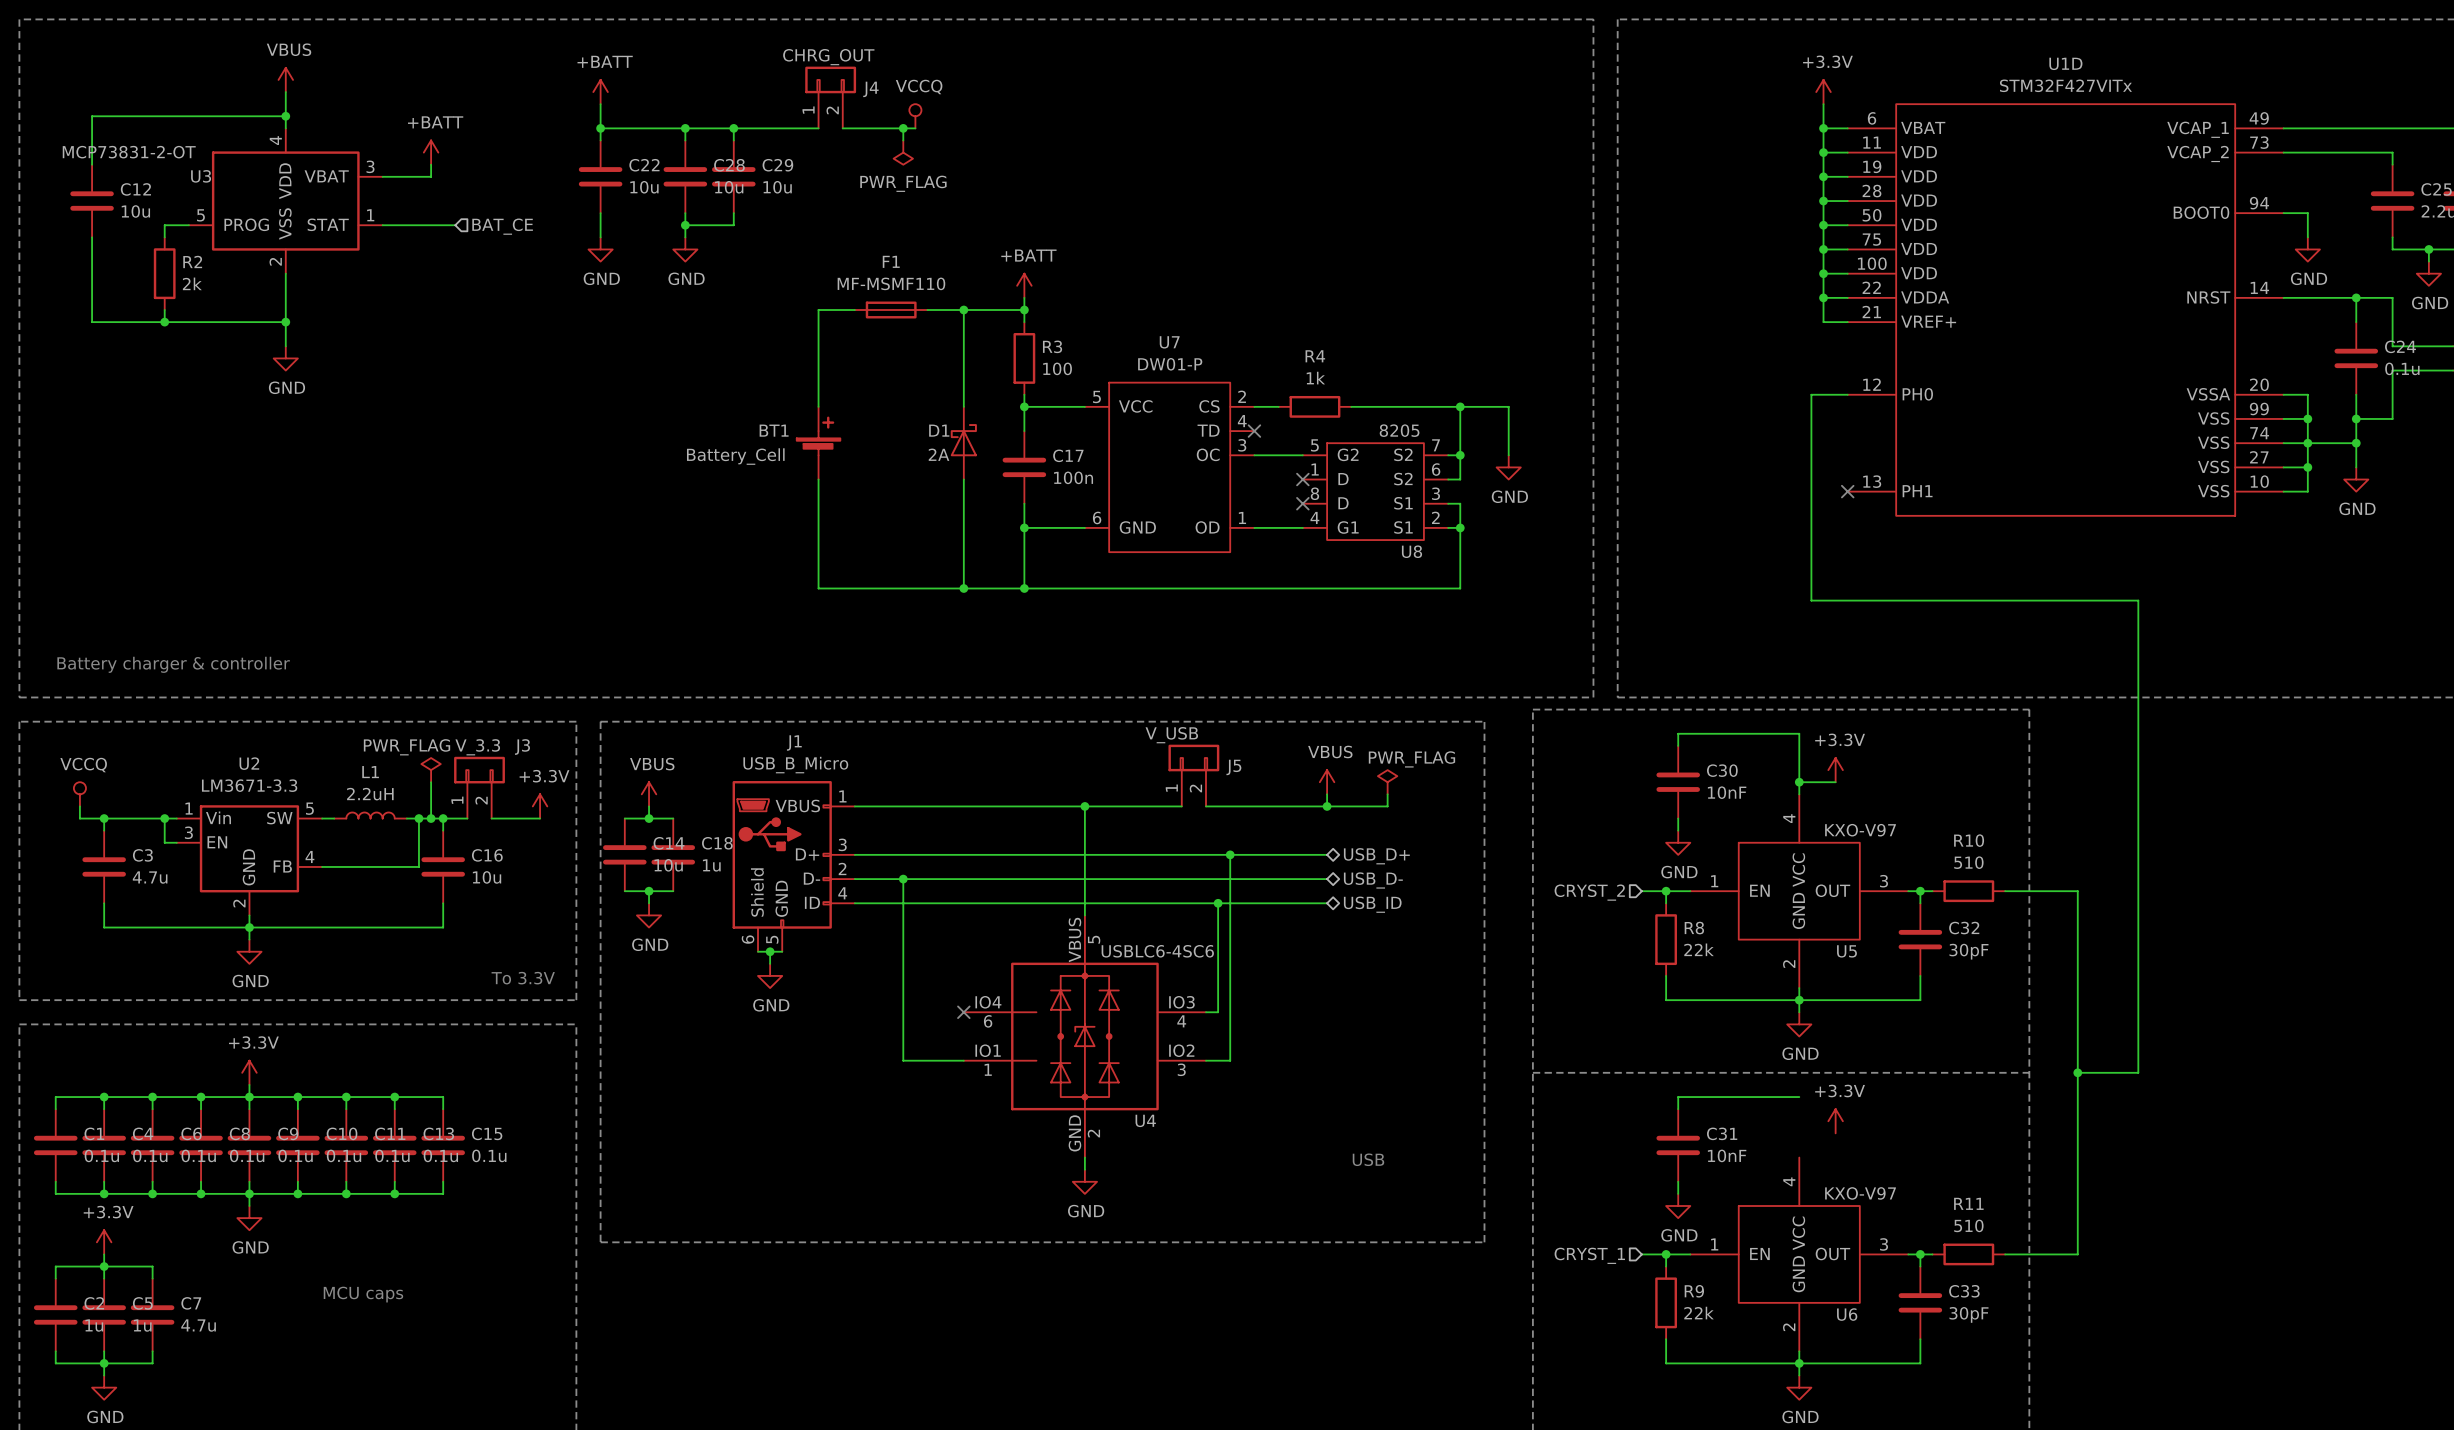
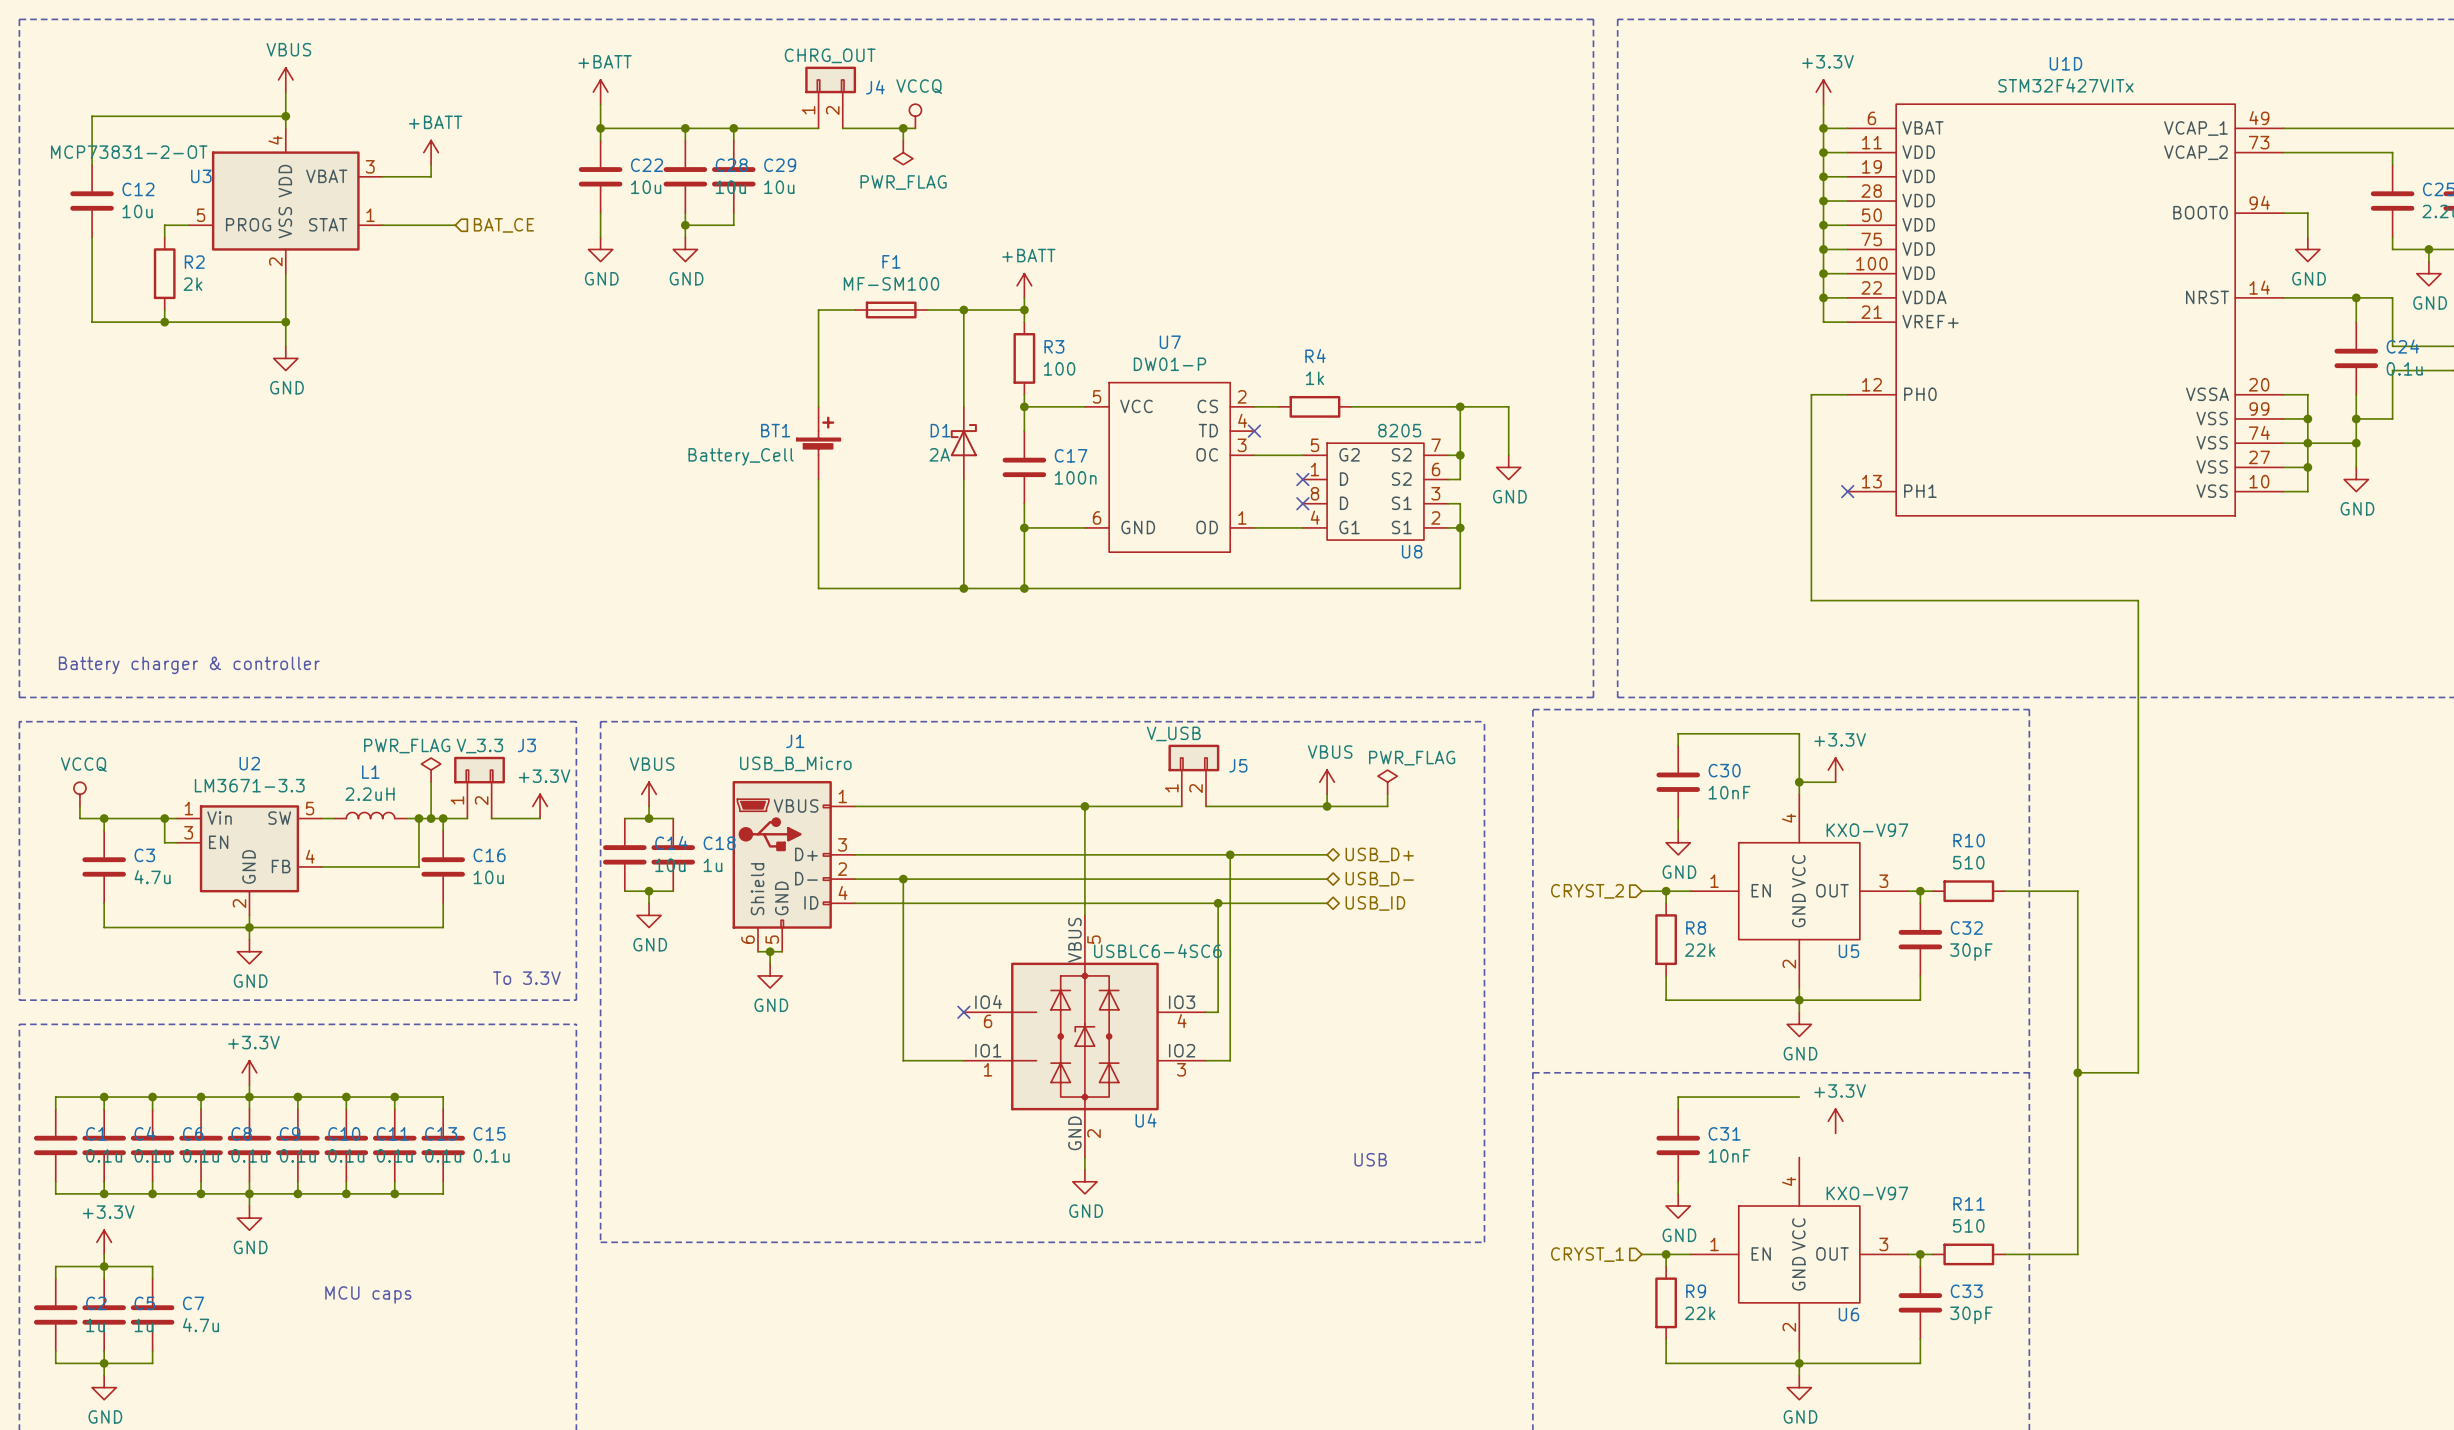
F1 value: MF-MSMF110 (891, 283) -> MF-SM100 (891, 283)

